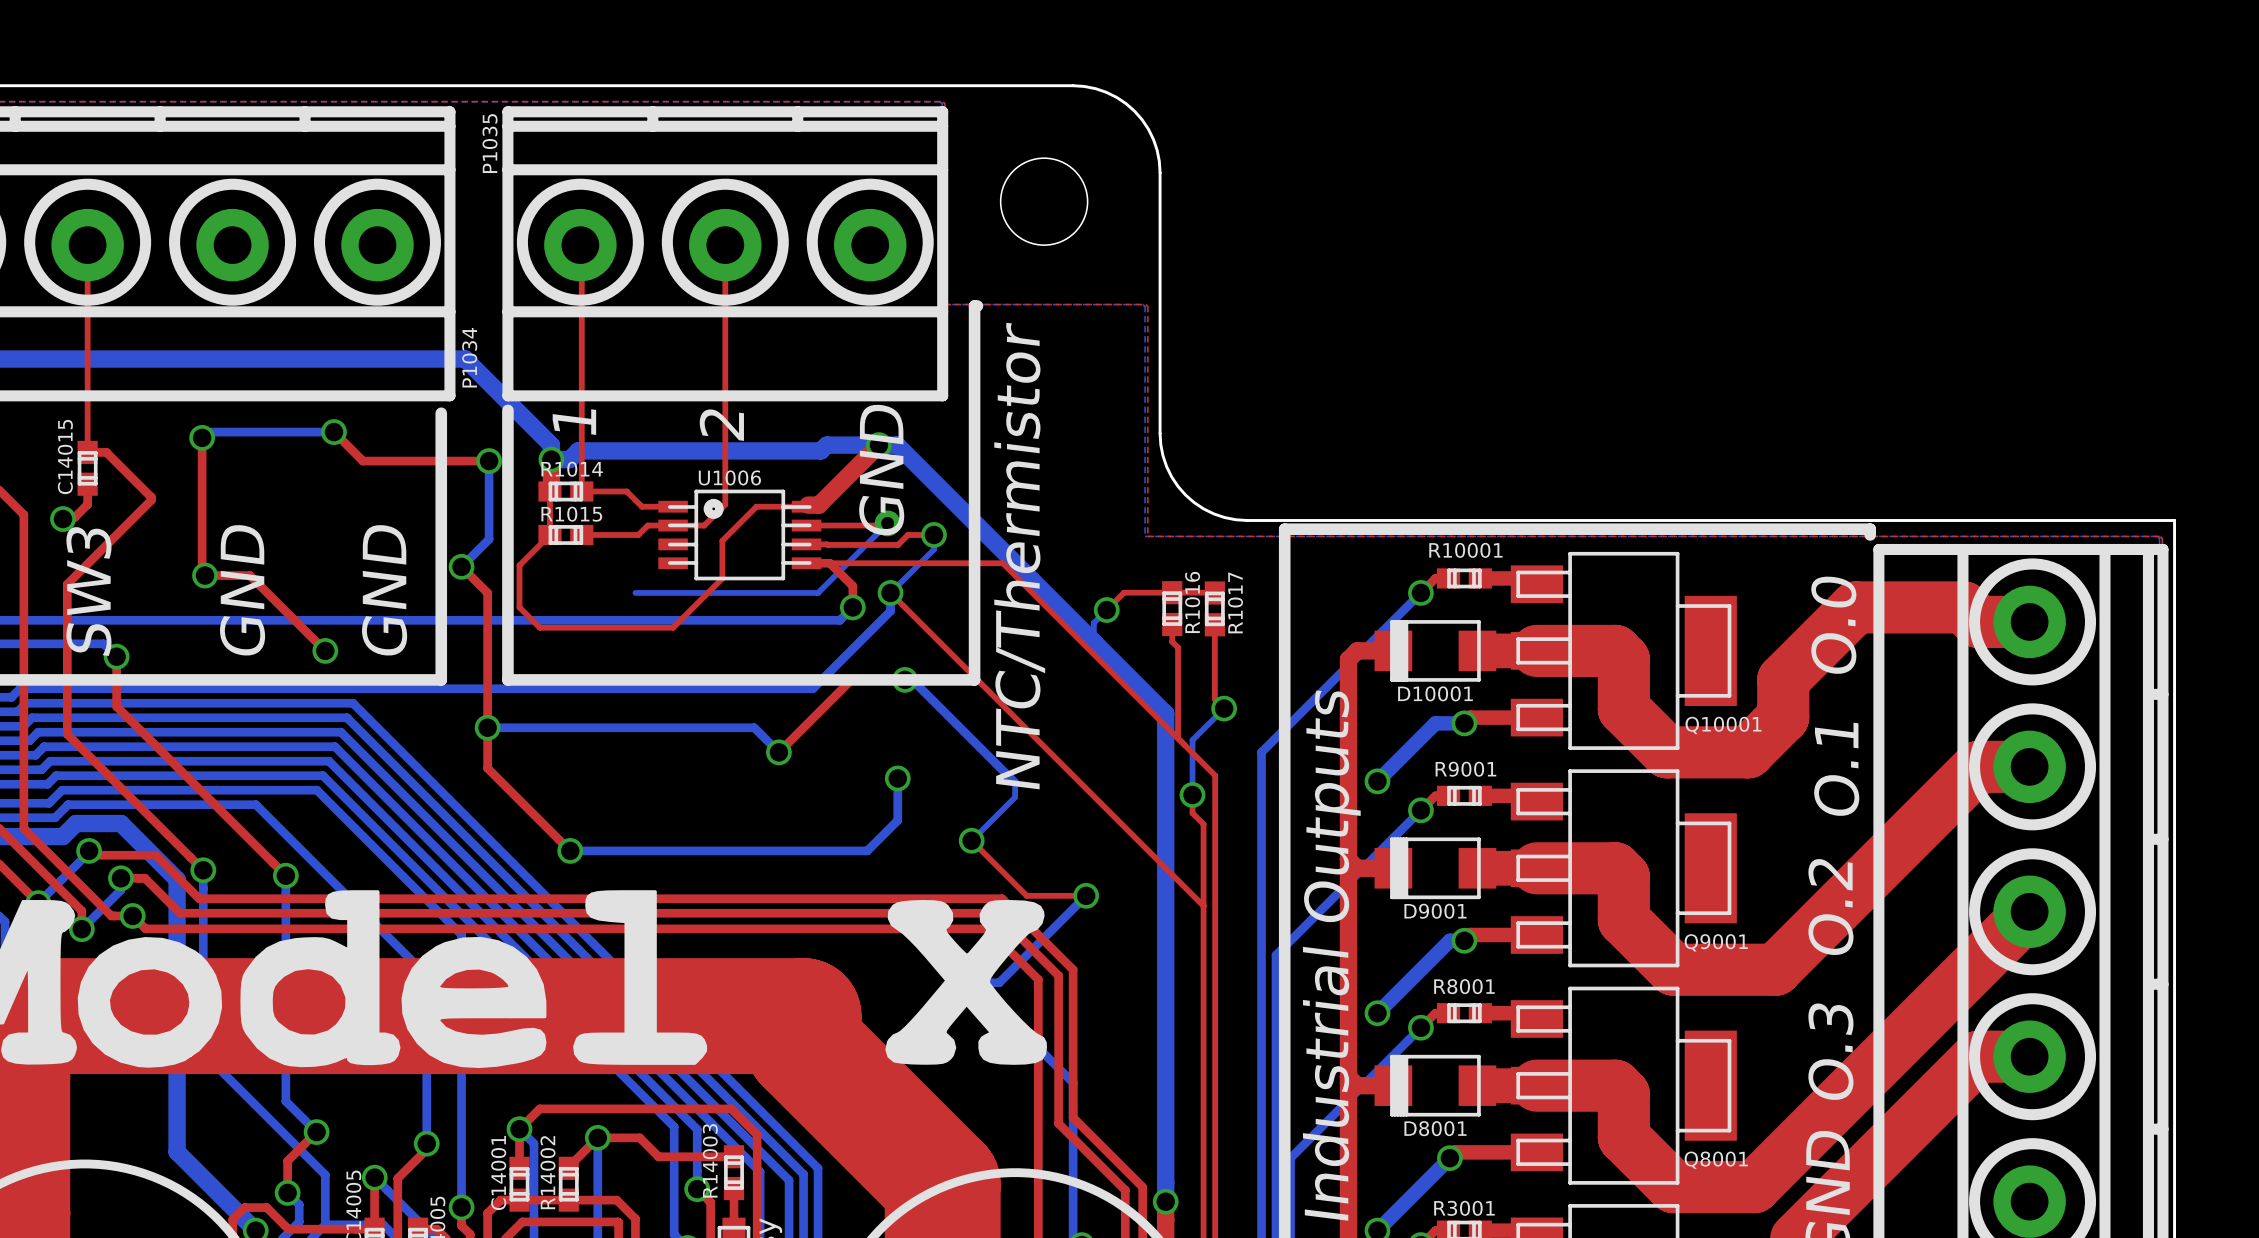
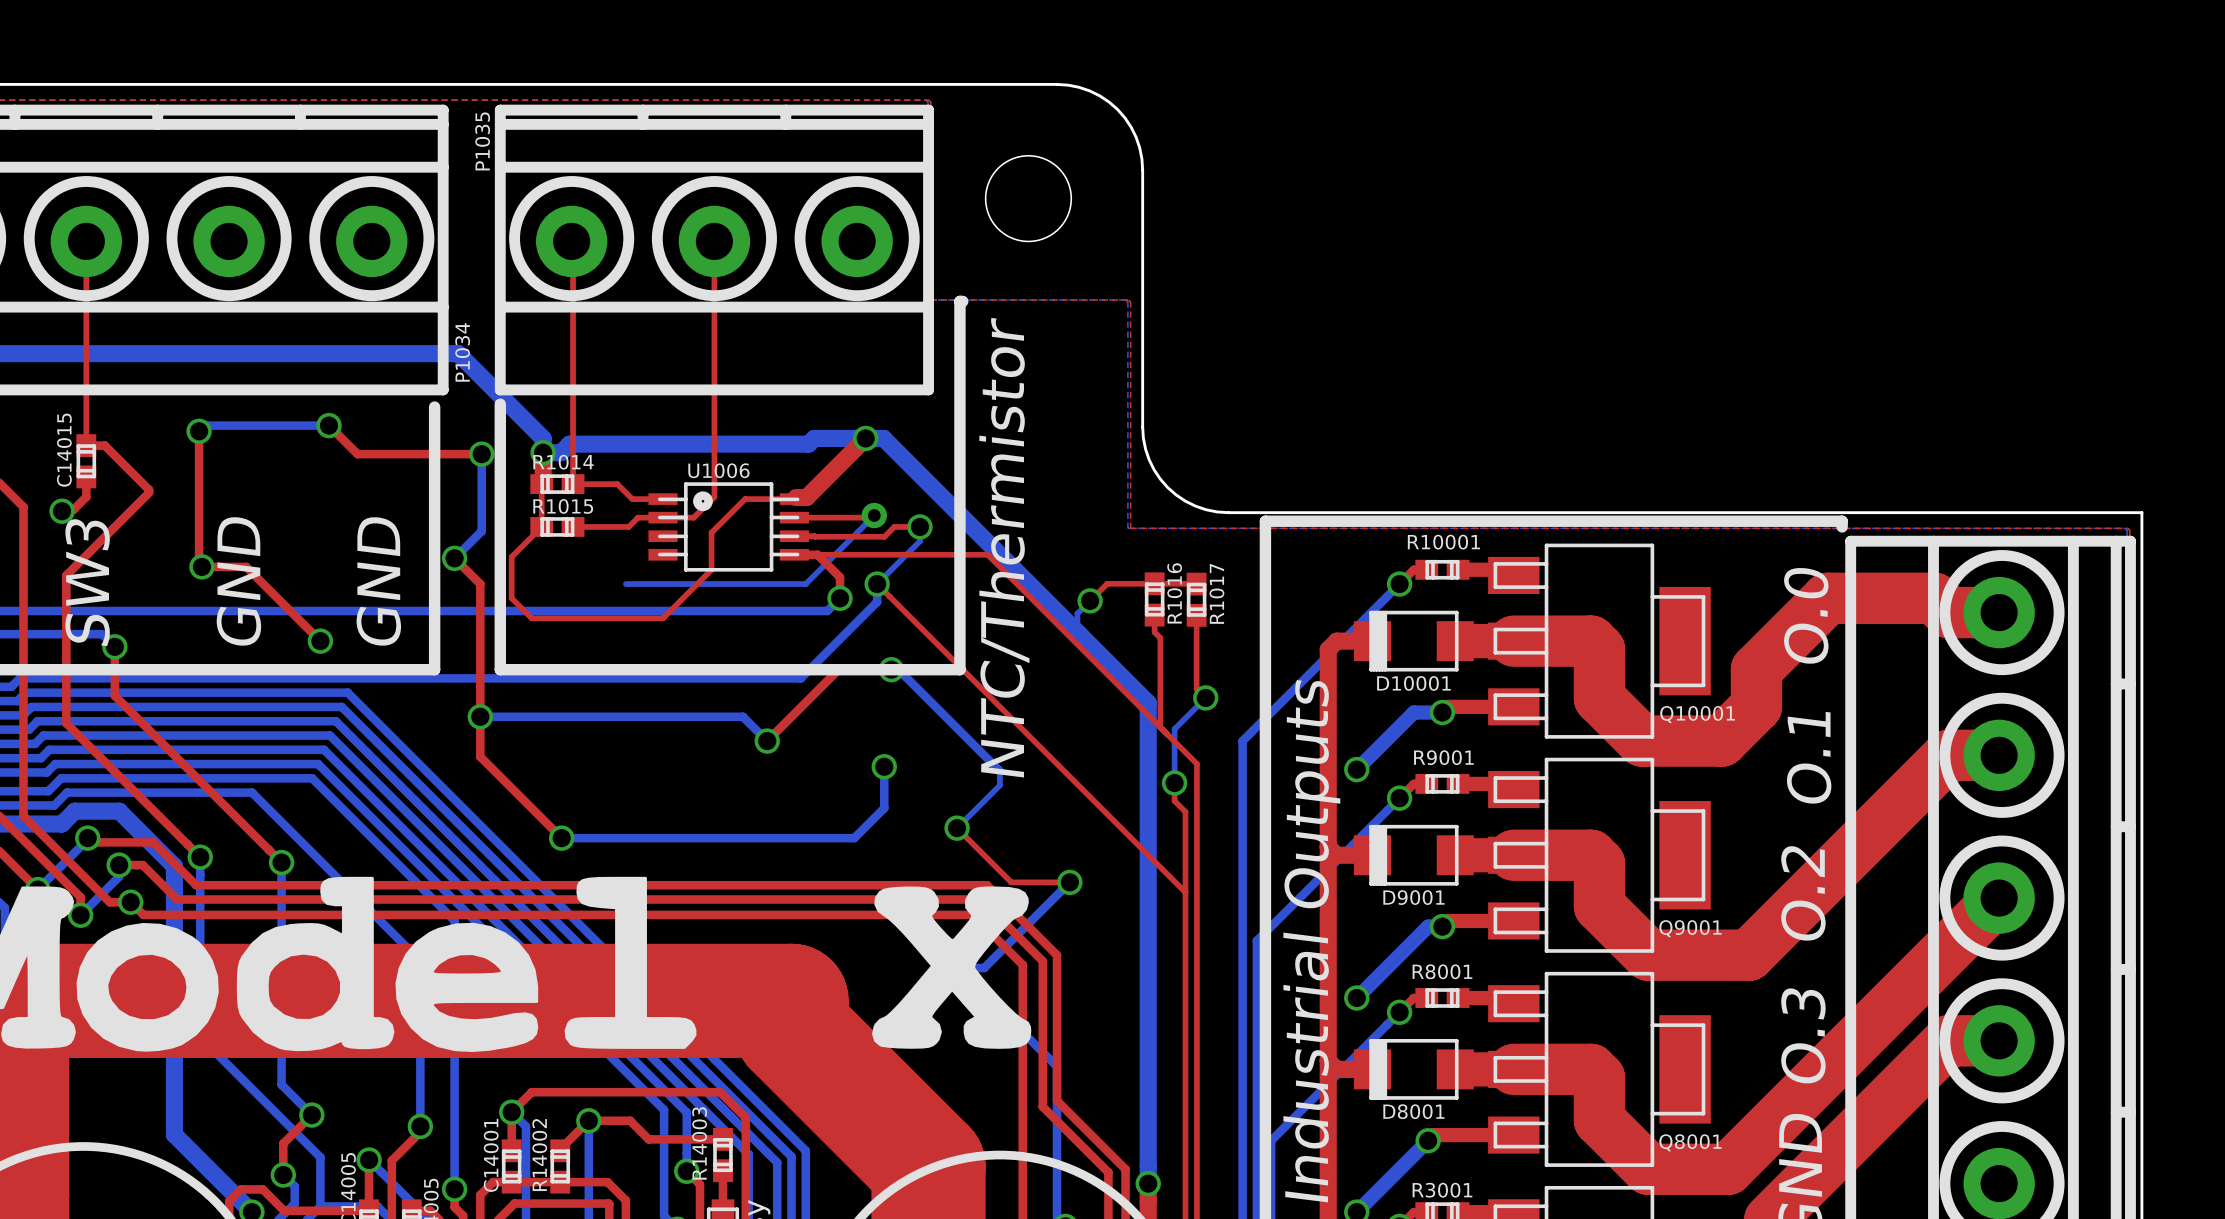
text: 1 (574, 422) -> none
text: 2 (721, 424) -> none
text: GND (881, 469) -> none

